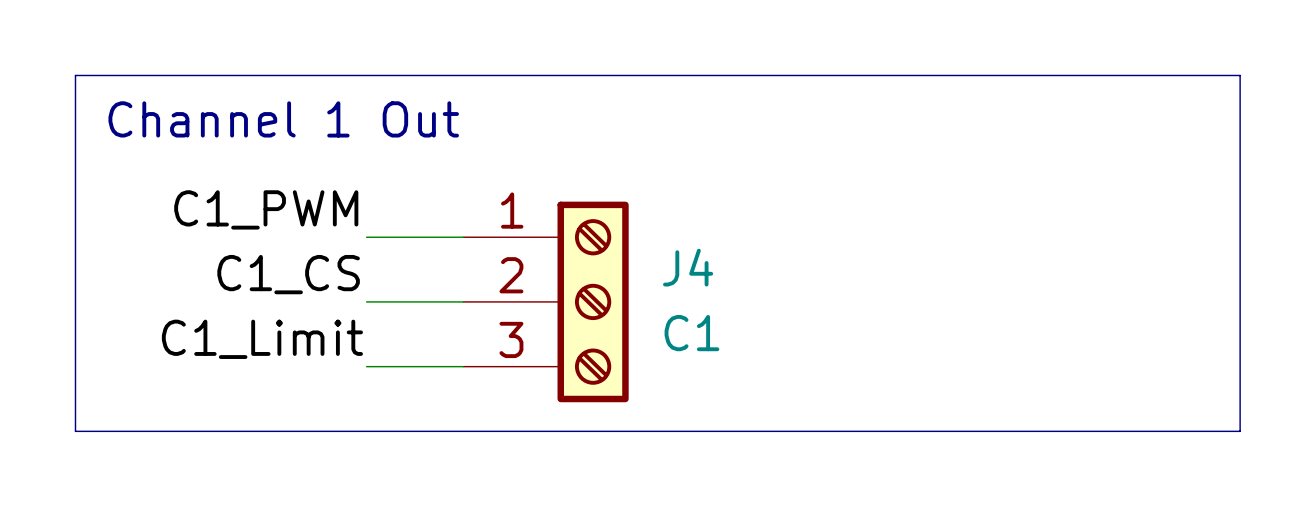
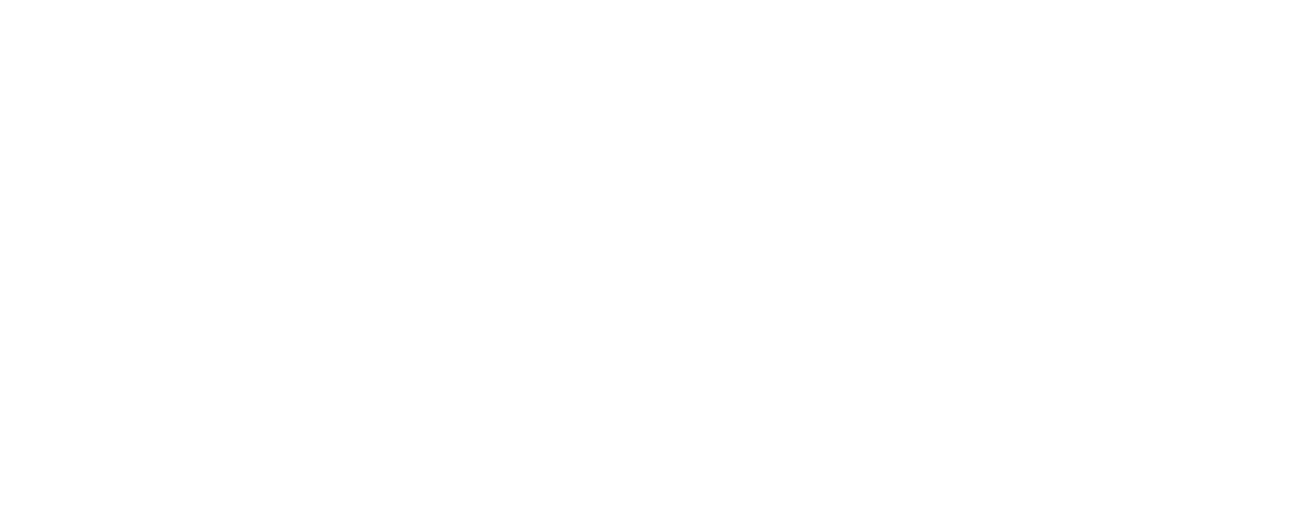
line: (75, 75) (75, 431) (1240, 431) (1240, 75) (75, 75) -> none
text: Channel 1 Out (283, 119) -> none
label: C1_PWM (266, 209) -> none
wire: (366, 237) (463, 237) -> none
label: C1_CS (288, 274) -> none
wire: (366, 301) (463, 301) -> none
J4: C1 (546, 301) -> none
label: C1_Limit (262, 339) -> none
wire: (366, 366) (463, 366) -> none

